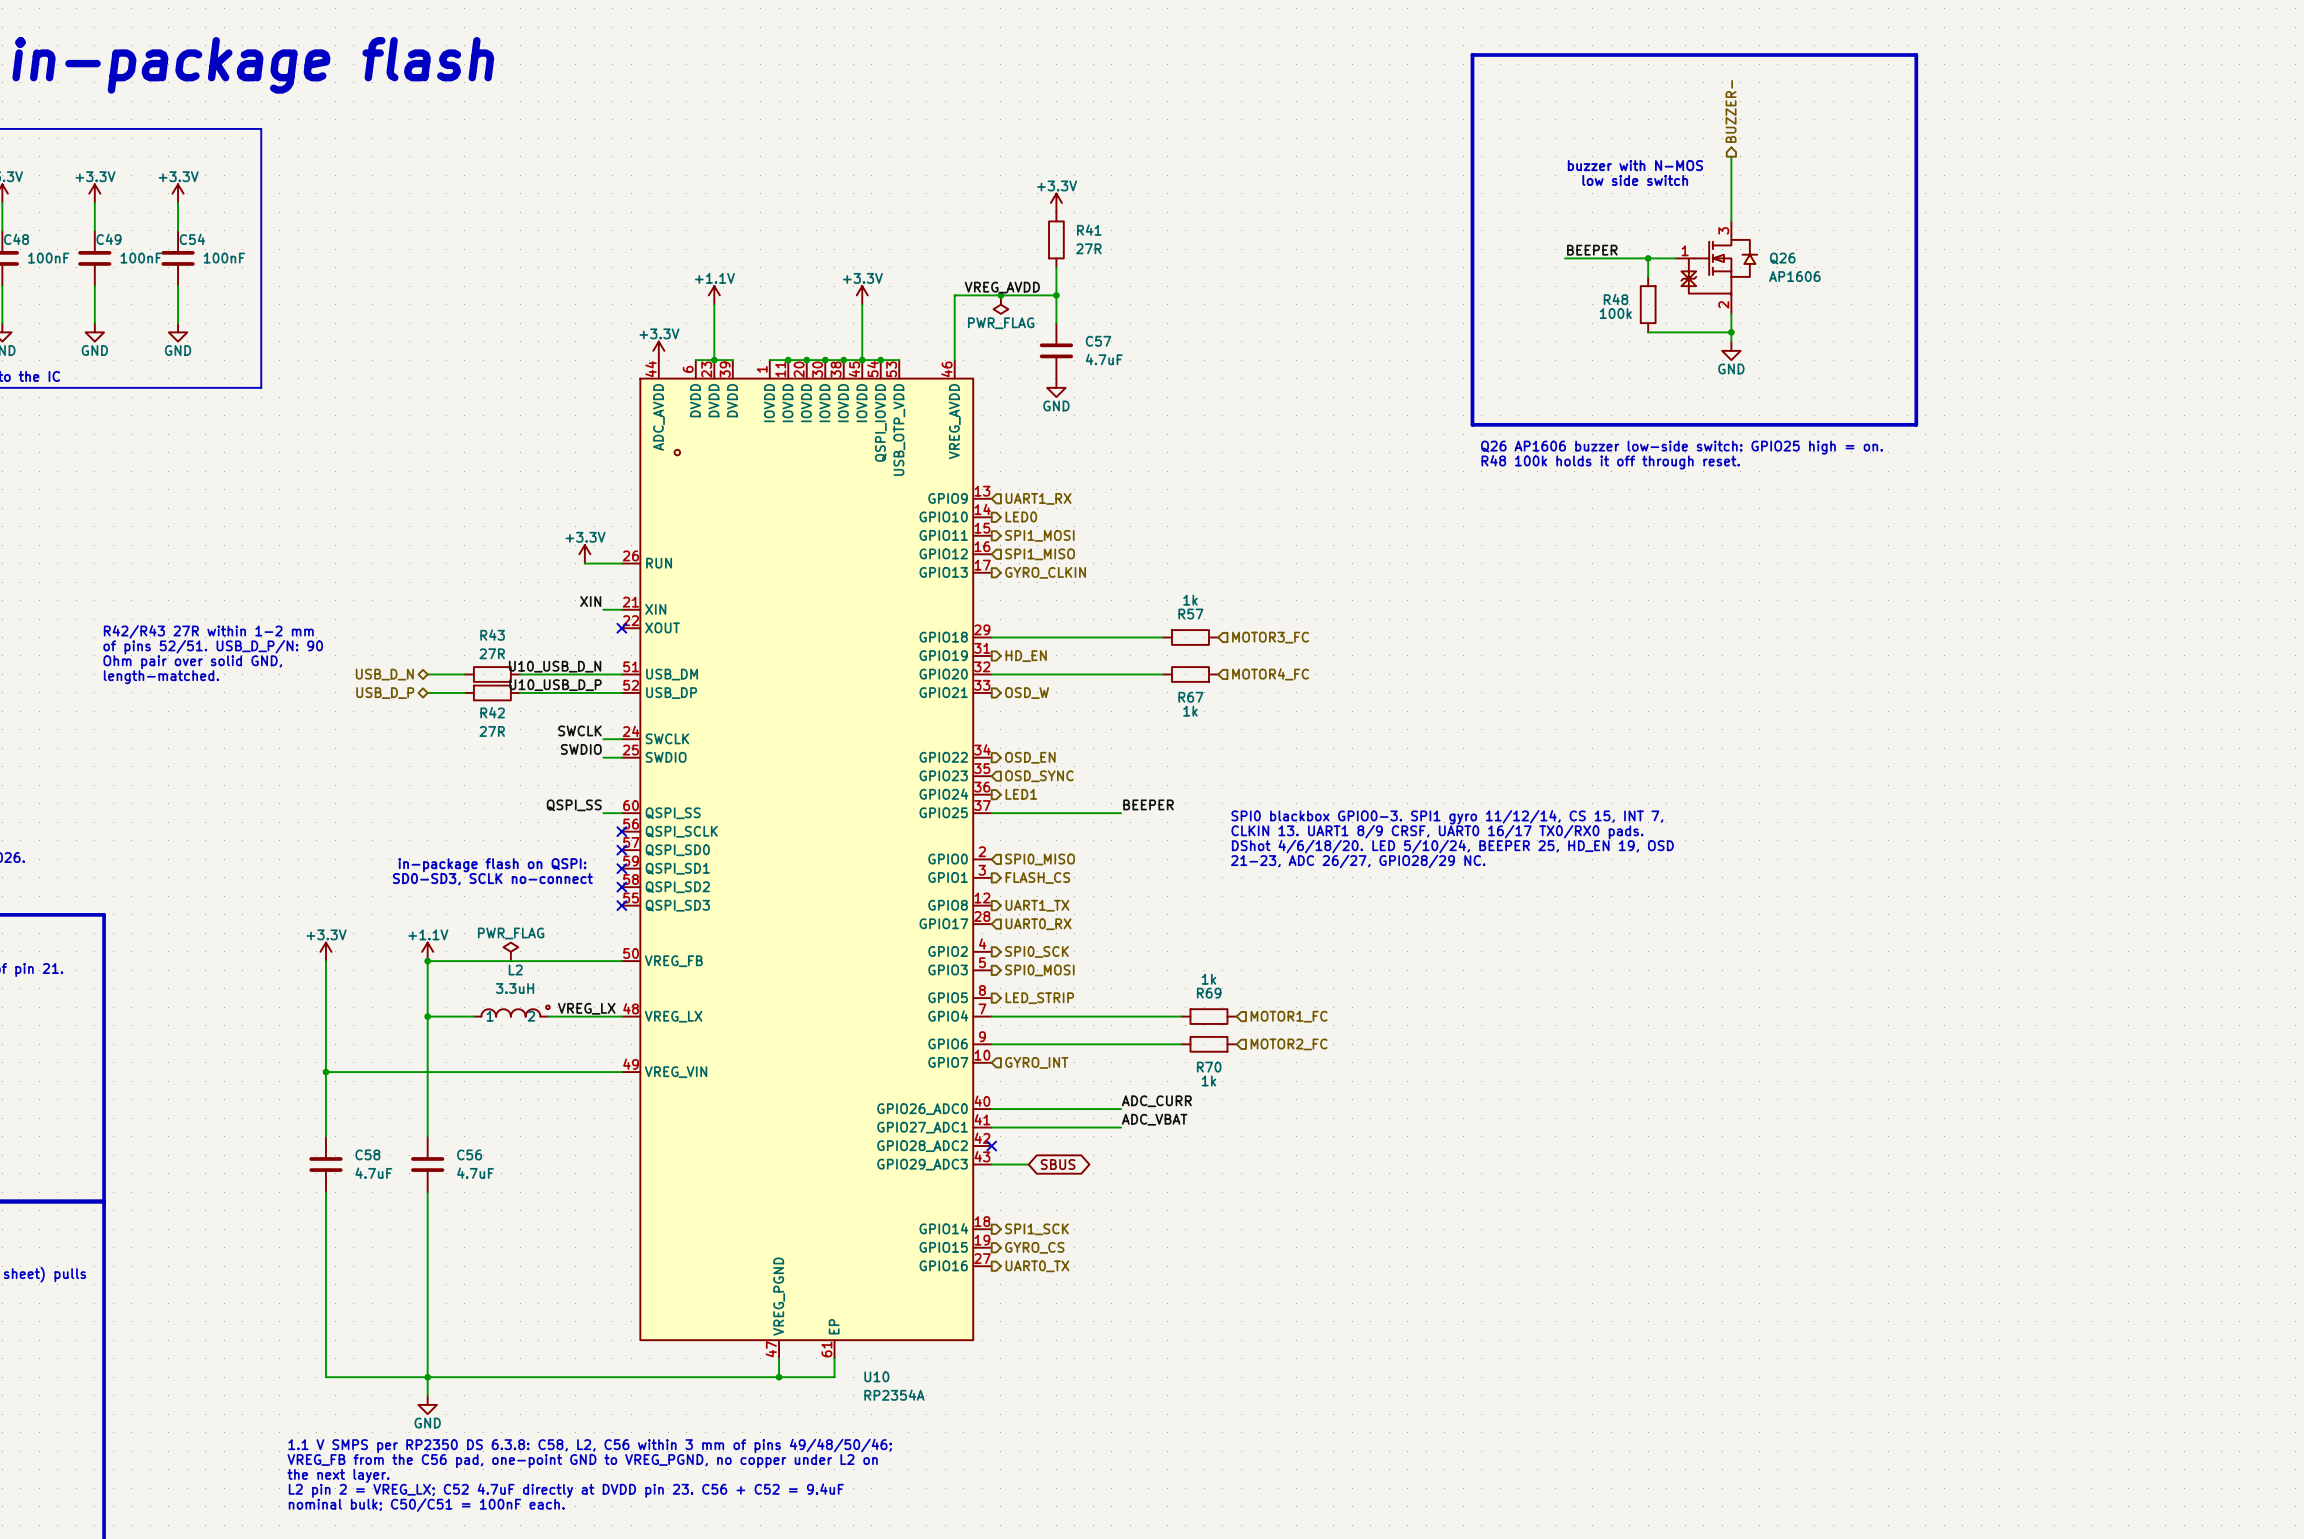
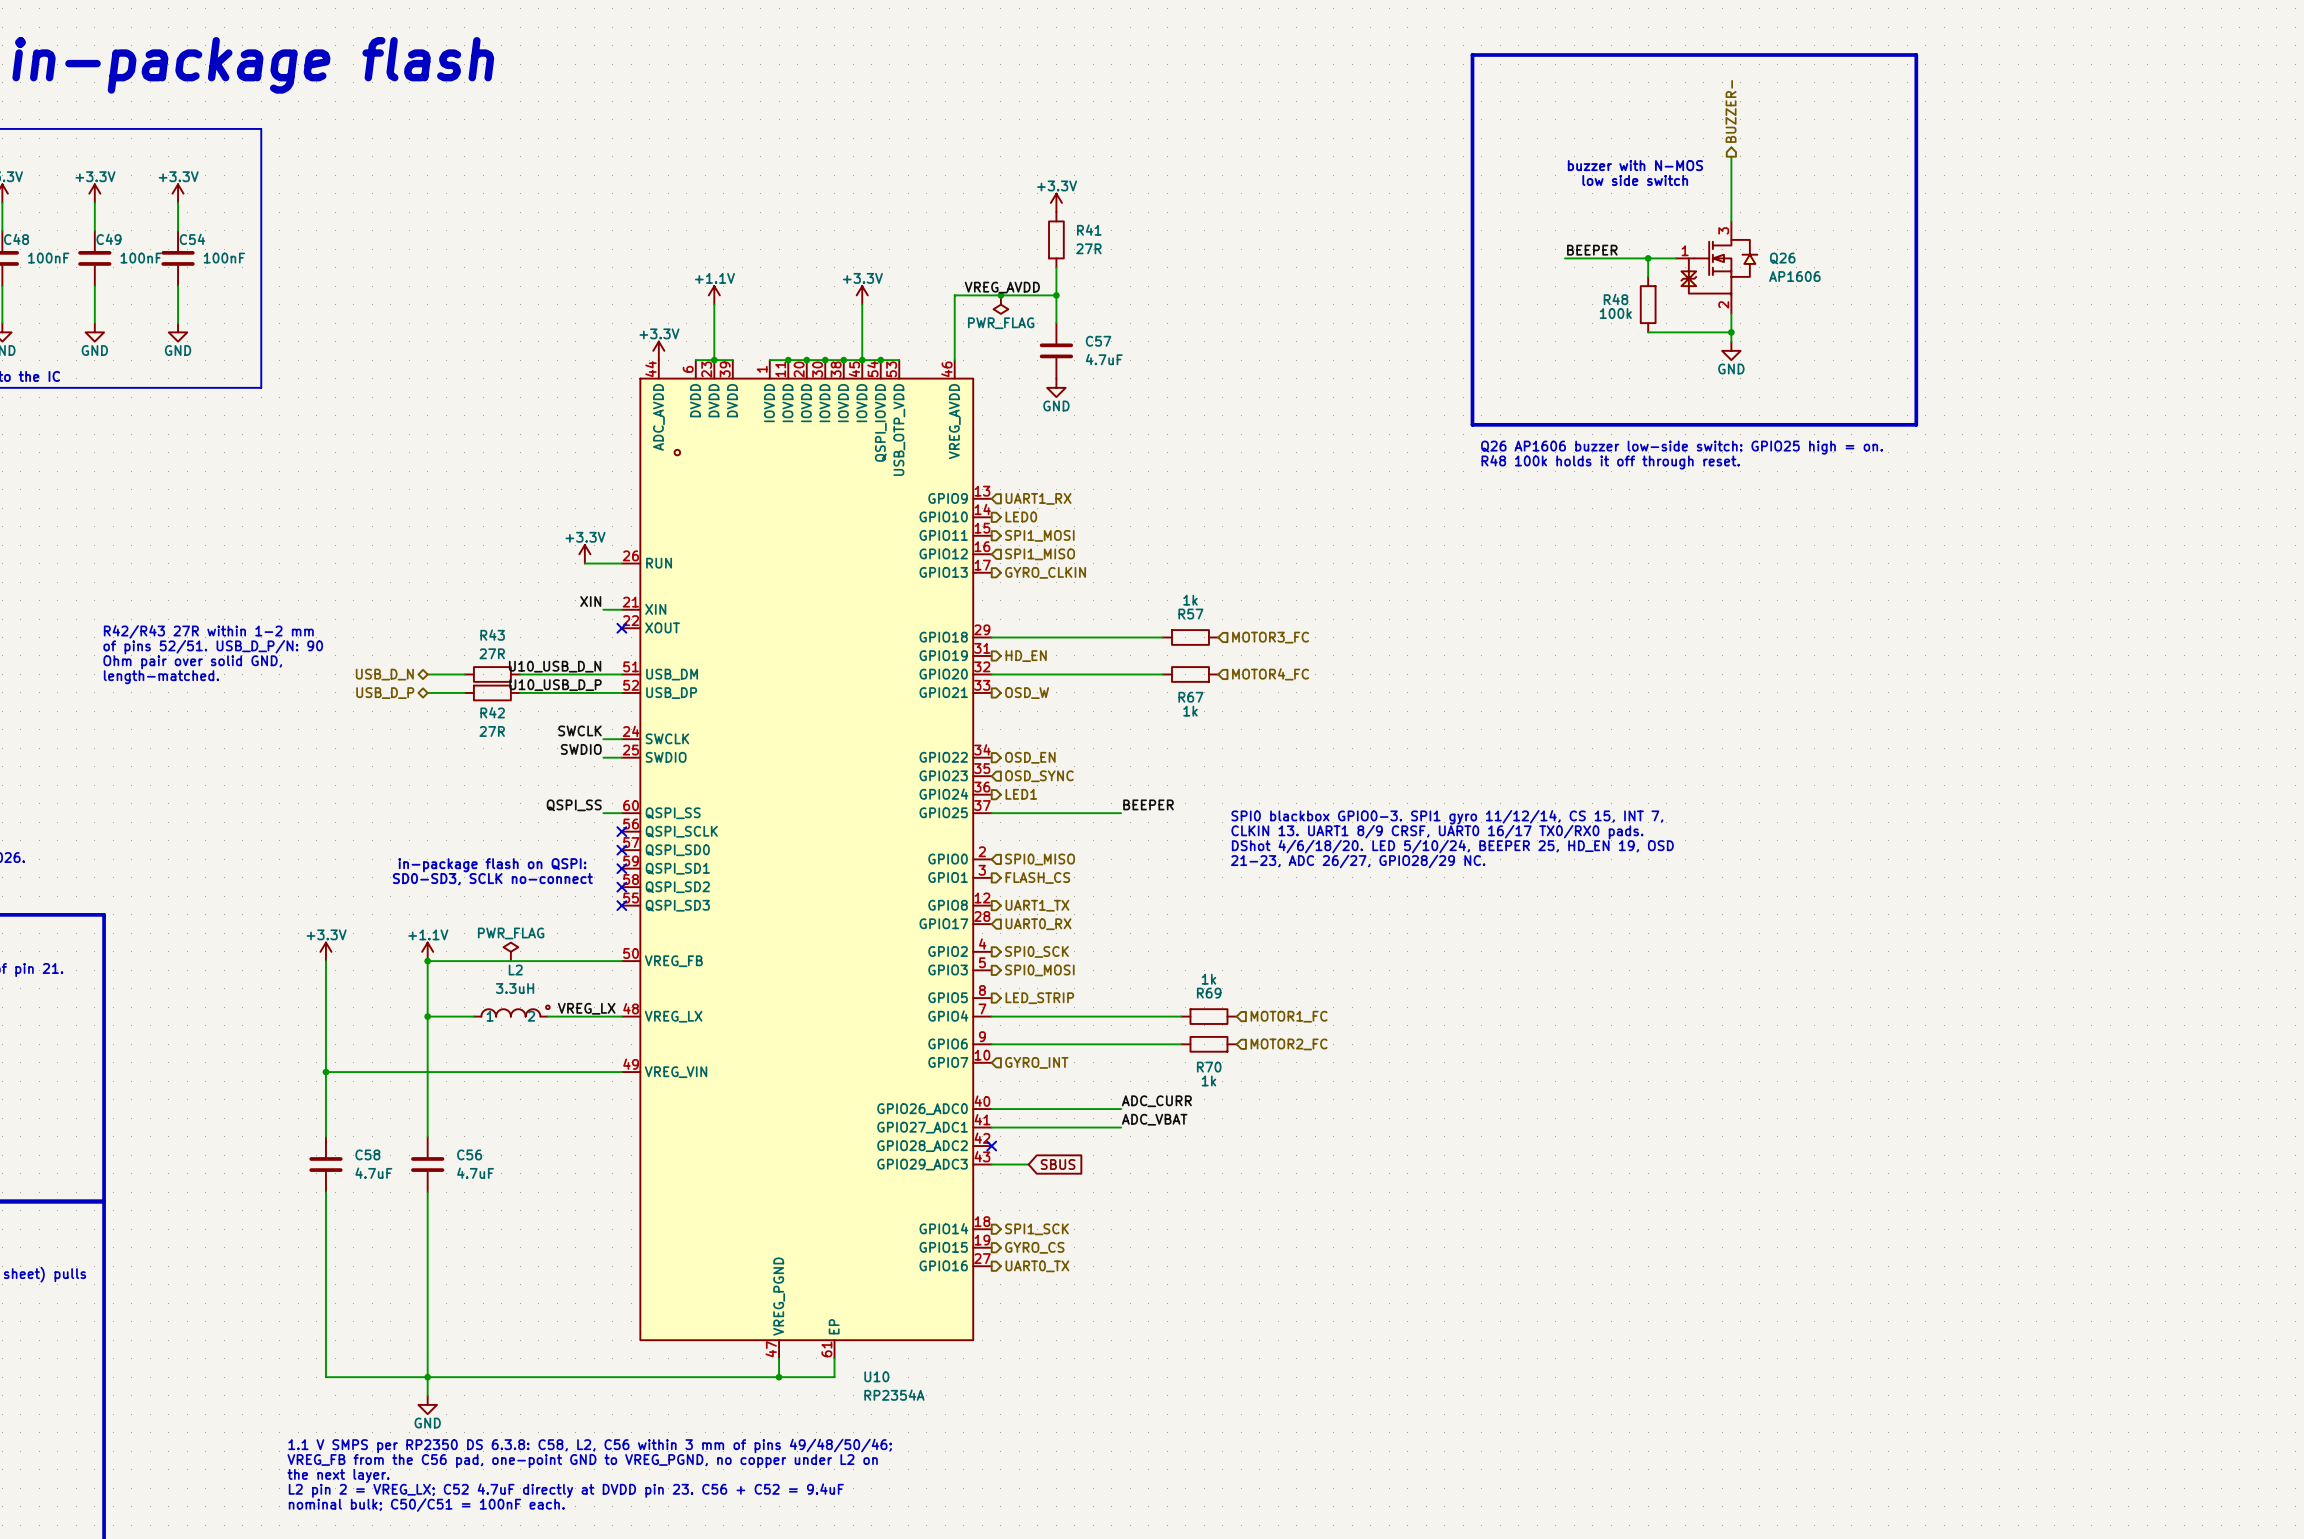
global label shape: bidirectional (1058, 1164) -> input (1058, 1164)

